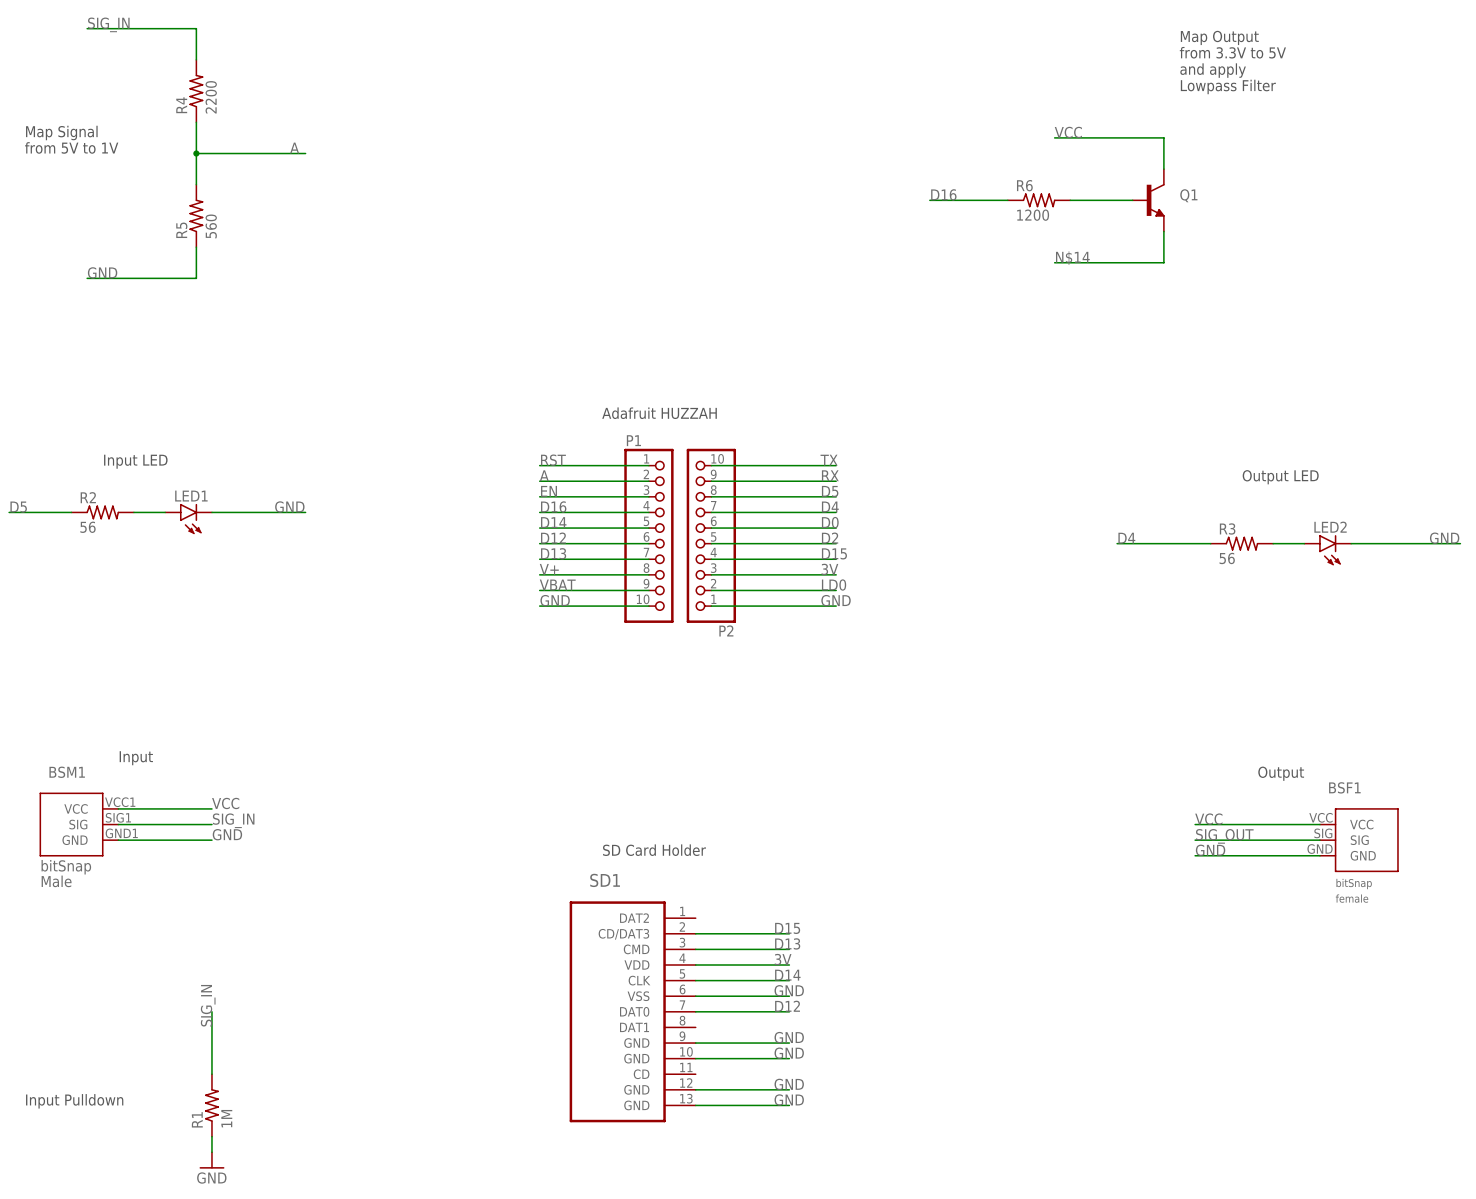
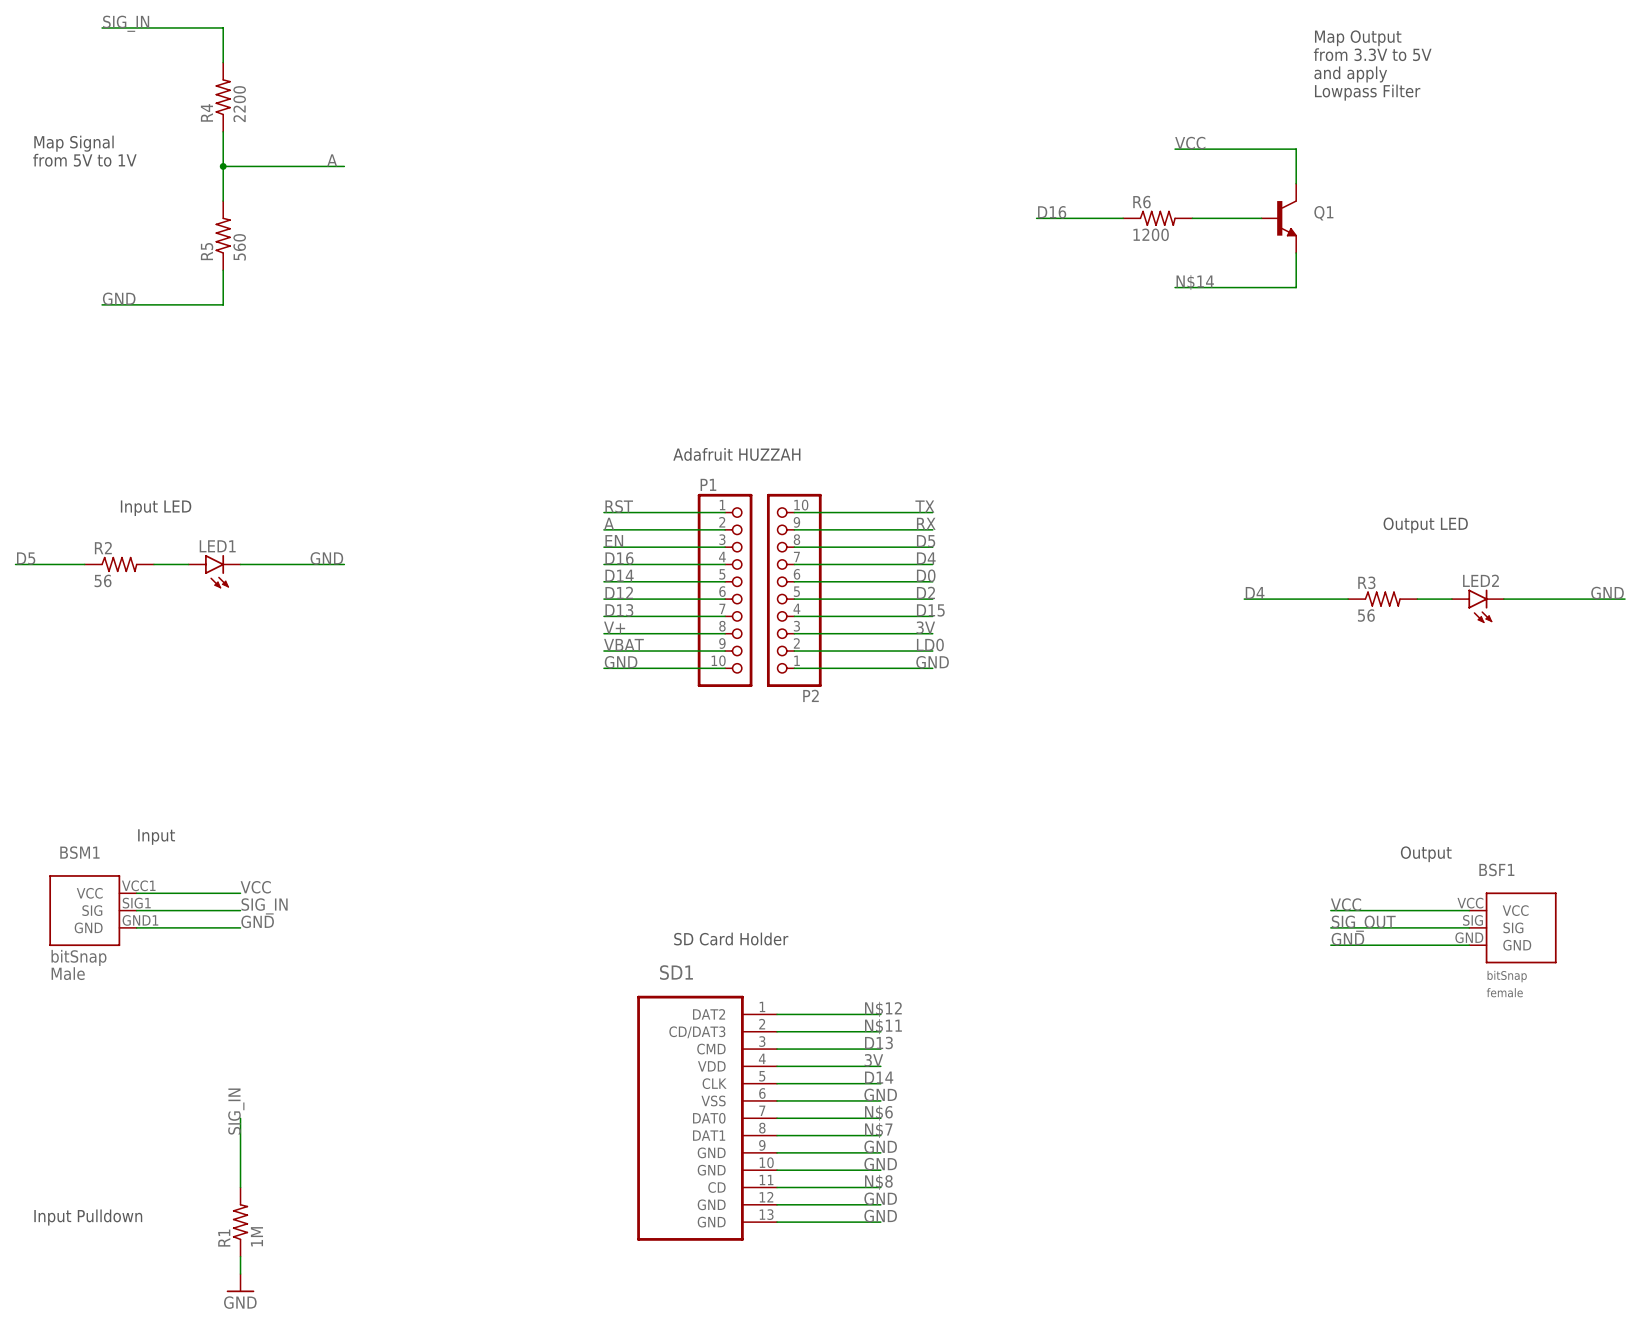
label: none -> N$12 (883, 1009)
wire: none -> (777, 1014) (880, 1014)
label: D15 (787, 928) -> N$11 (883, 1026)
label: D12 (787, 1006) -> N$6 (878, 1113)
label: none -> N$7 (878, 1130)
wire: none -> (777, 1135) (880, 1135)
label: none -> N$8 (878, 1182)
wire: none -> (777, 1187) (880, 1187)

